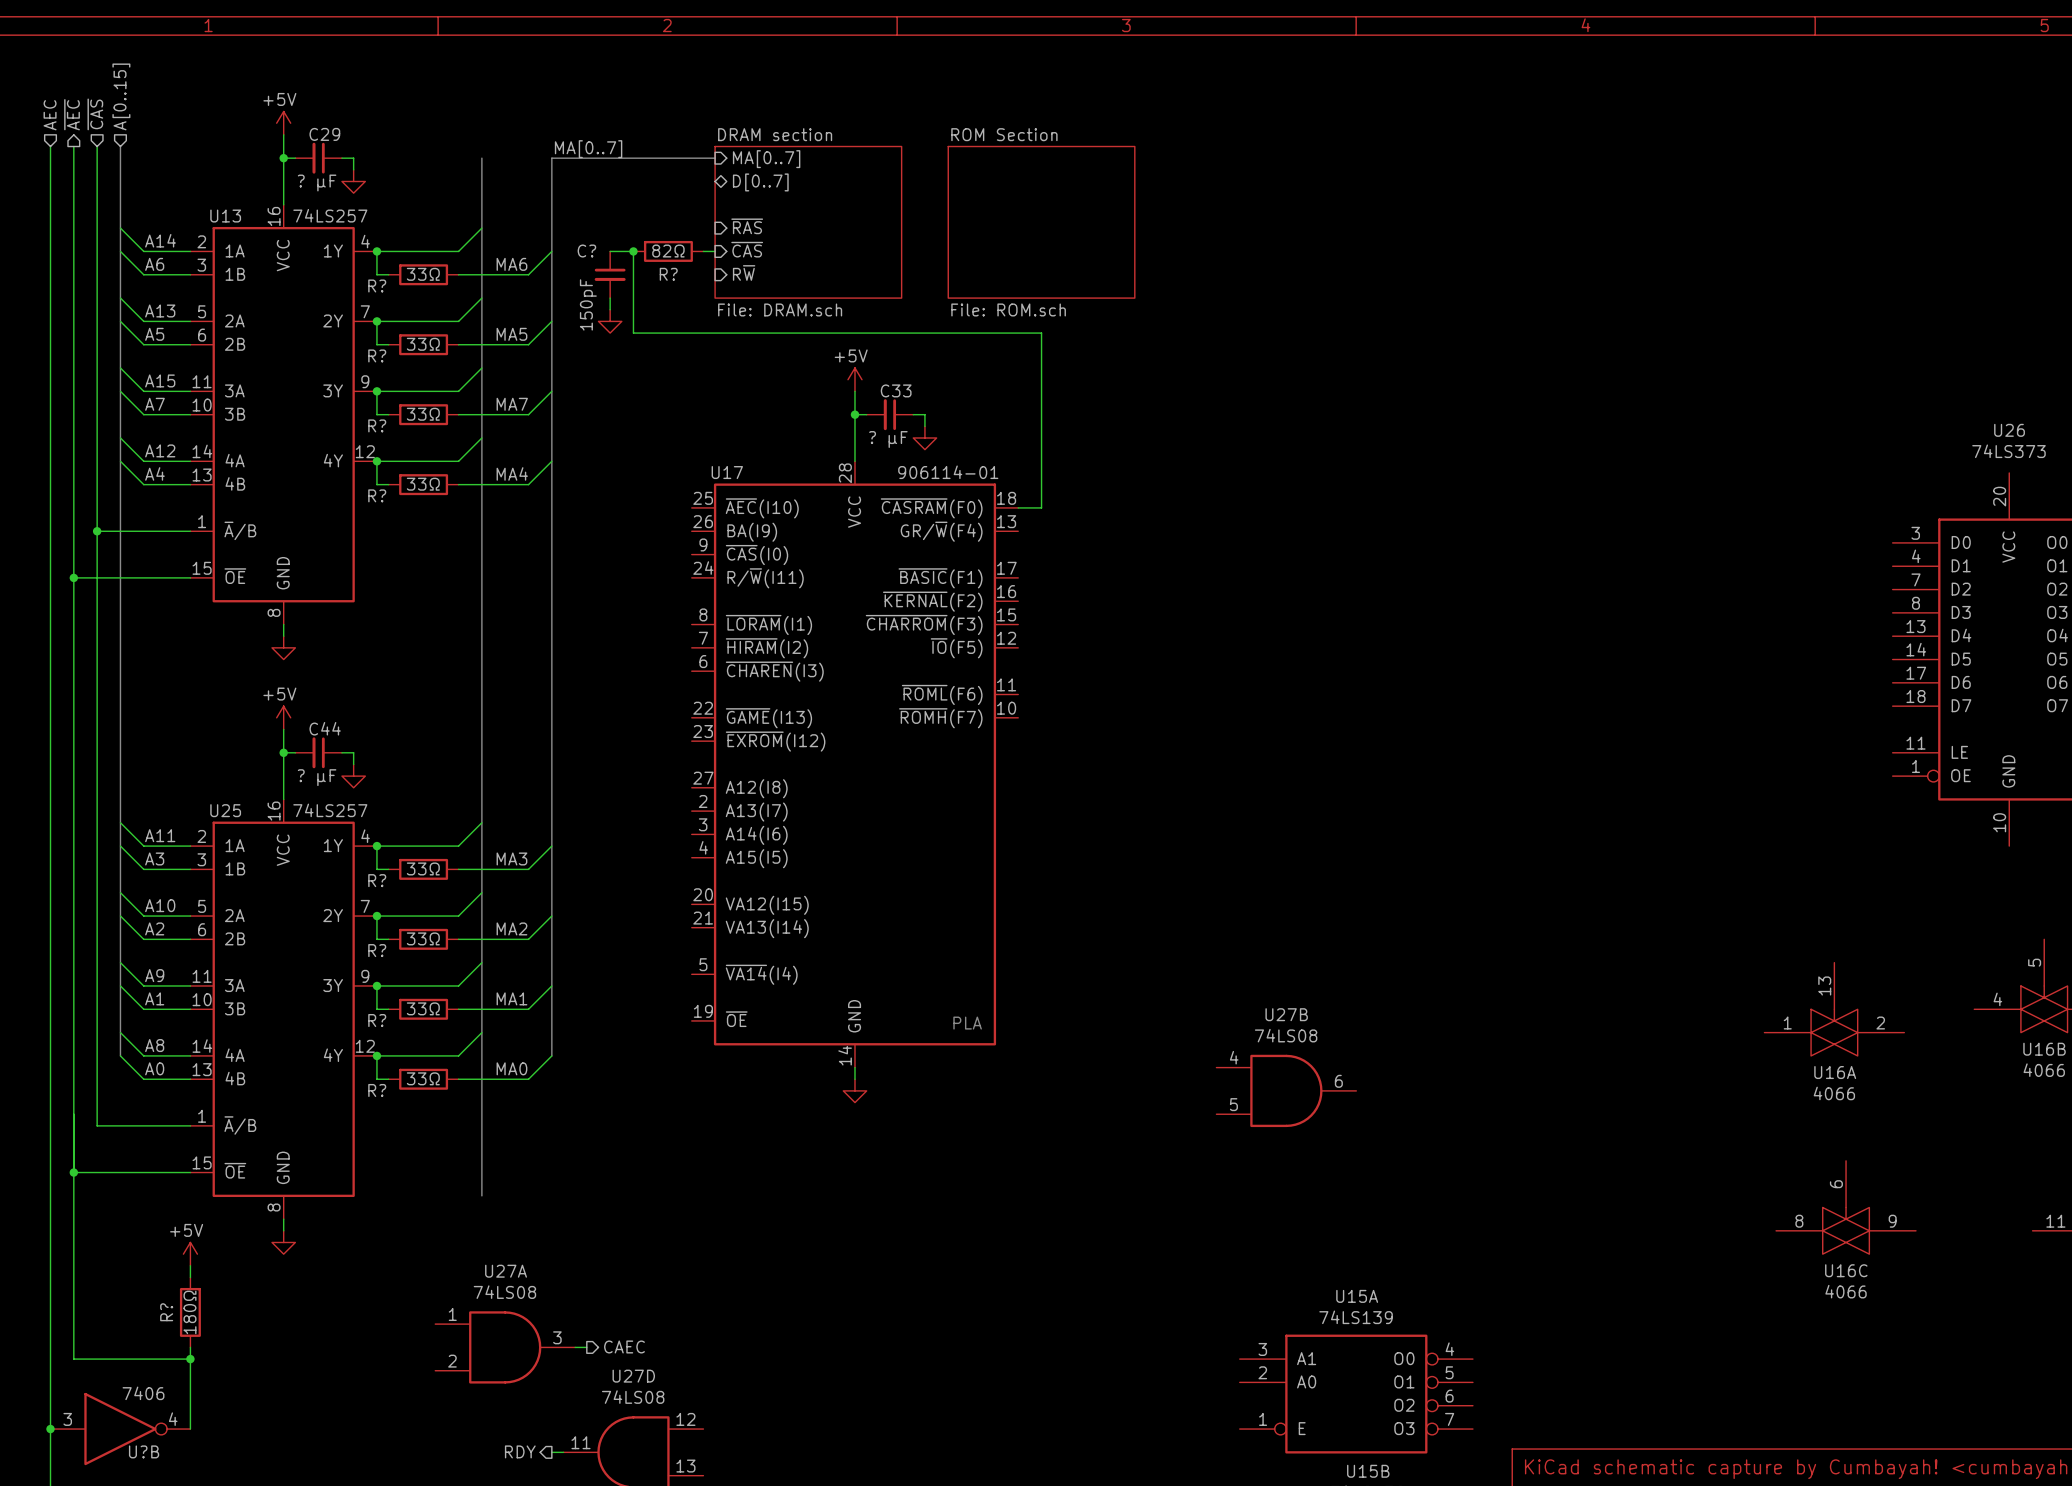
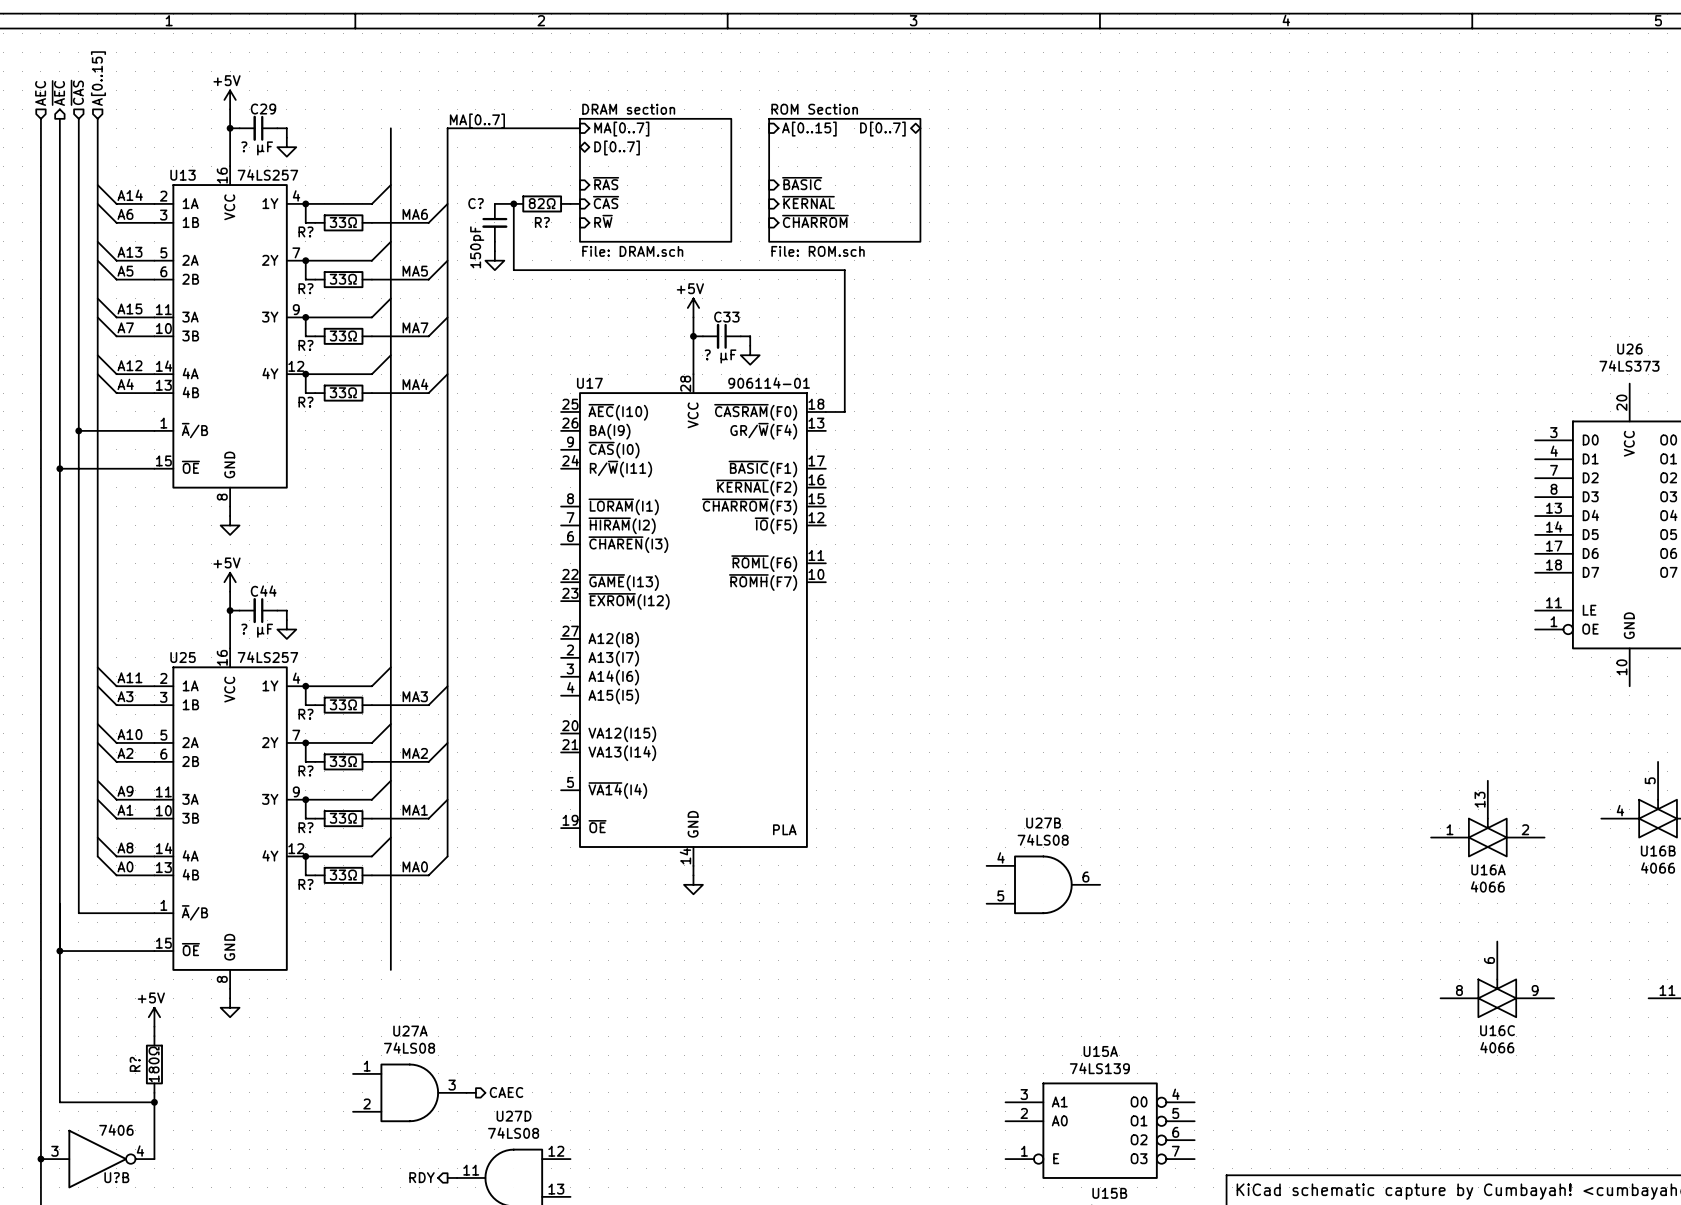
sheet pin: none -> A[0..15] (809, 129)
sheet pin: none -> D[0..7] (882, 129)
sheet pin: none -> ~{BASIC} (802, 183)
sheet pin: none -> ~{KERNAL} (808, 202)
sheet pin: none -> ~{CHARROM} (815, 221)

